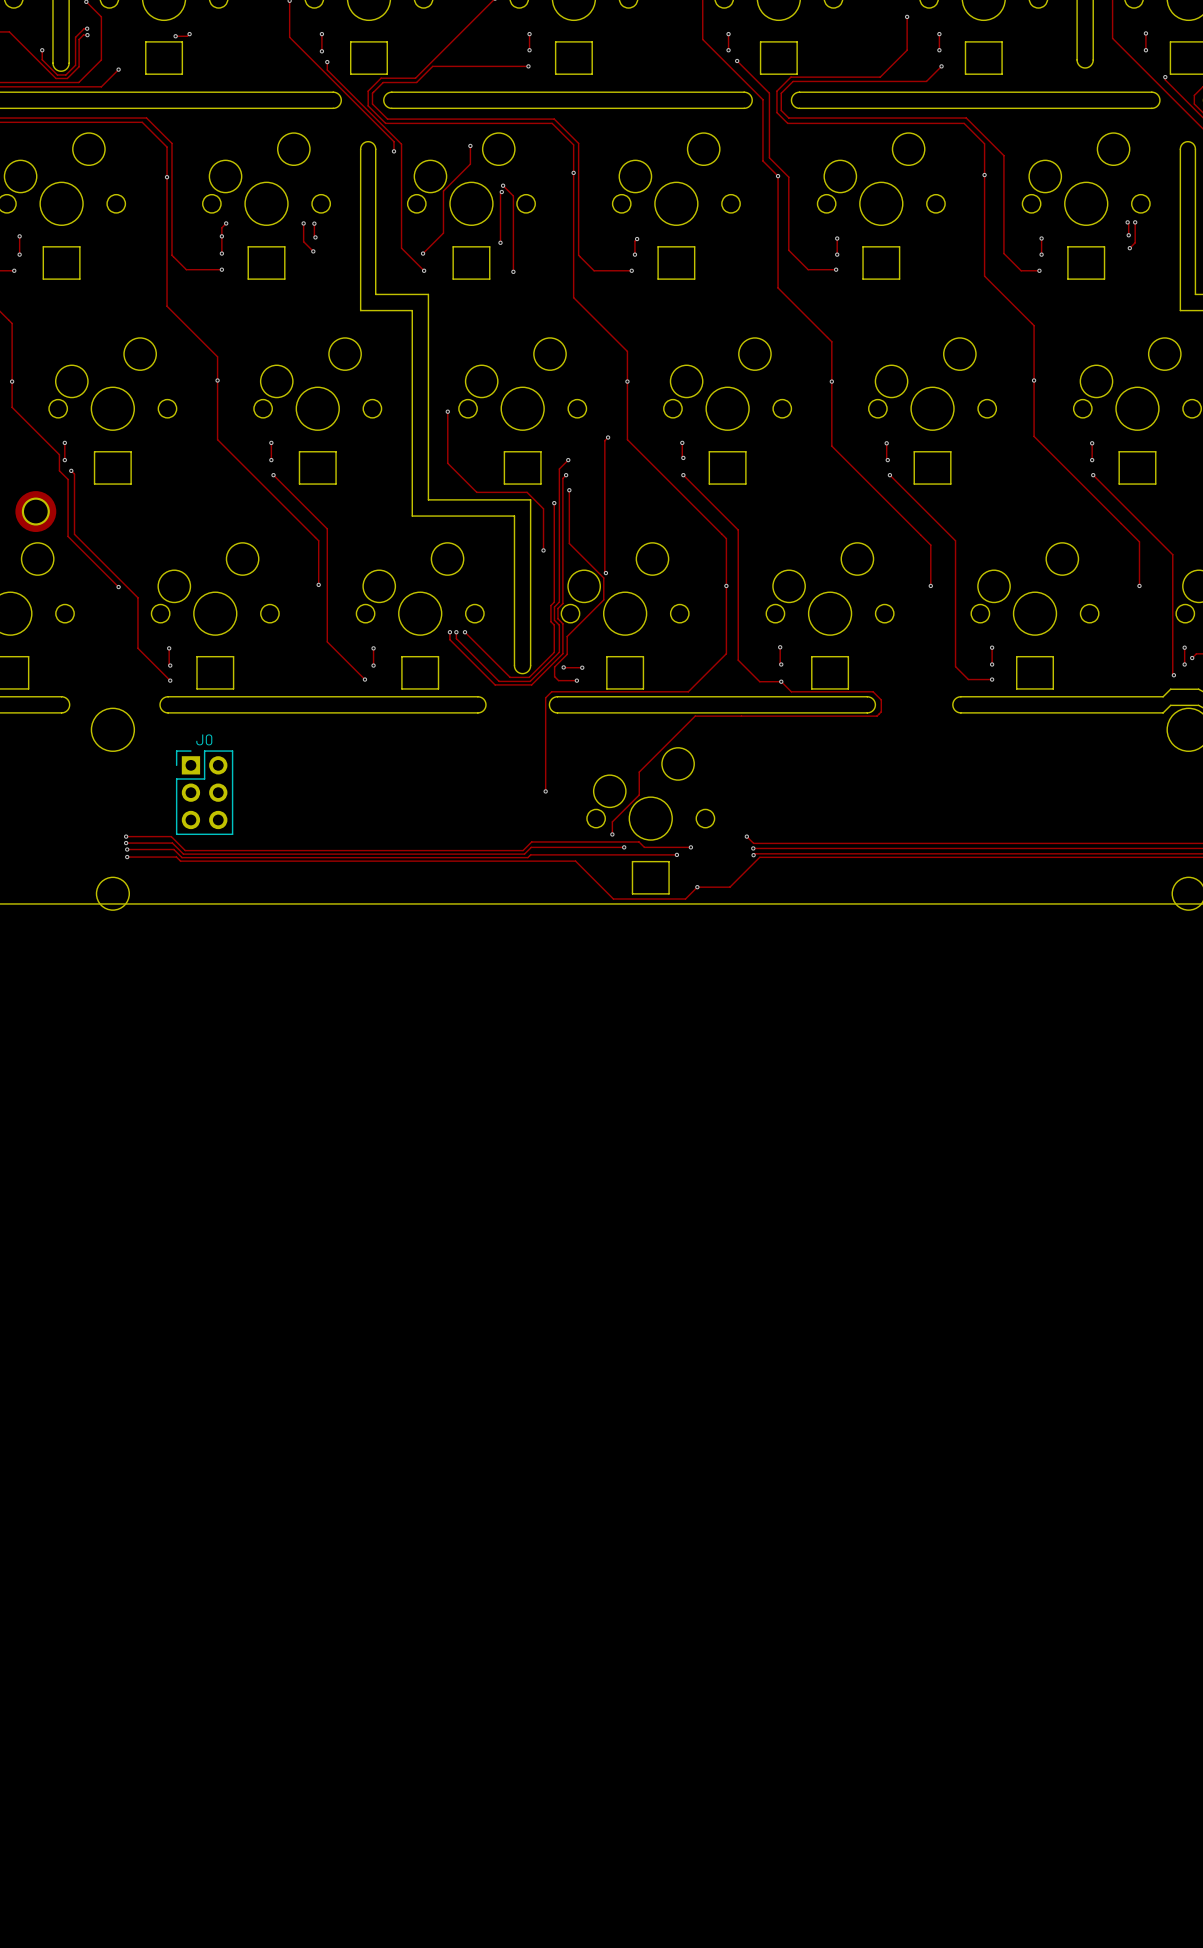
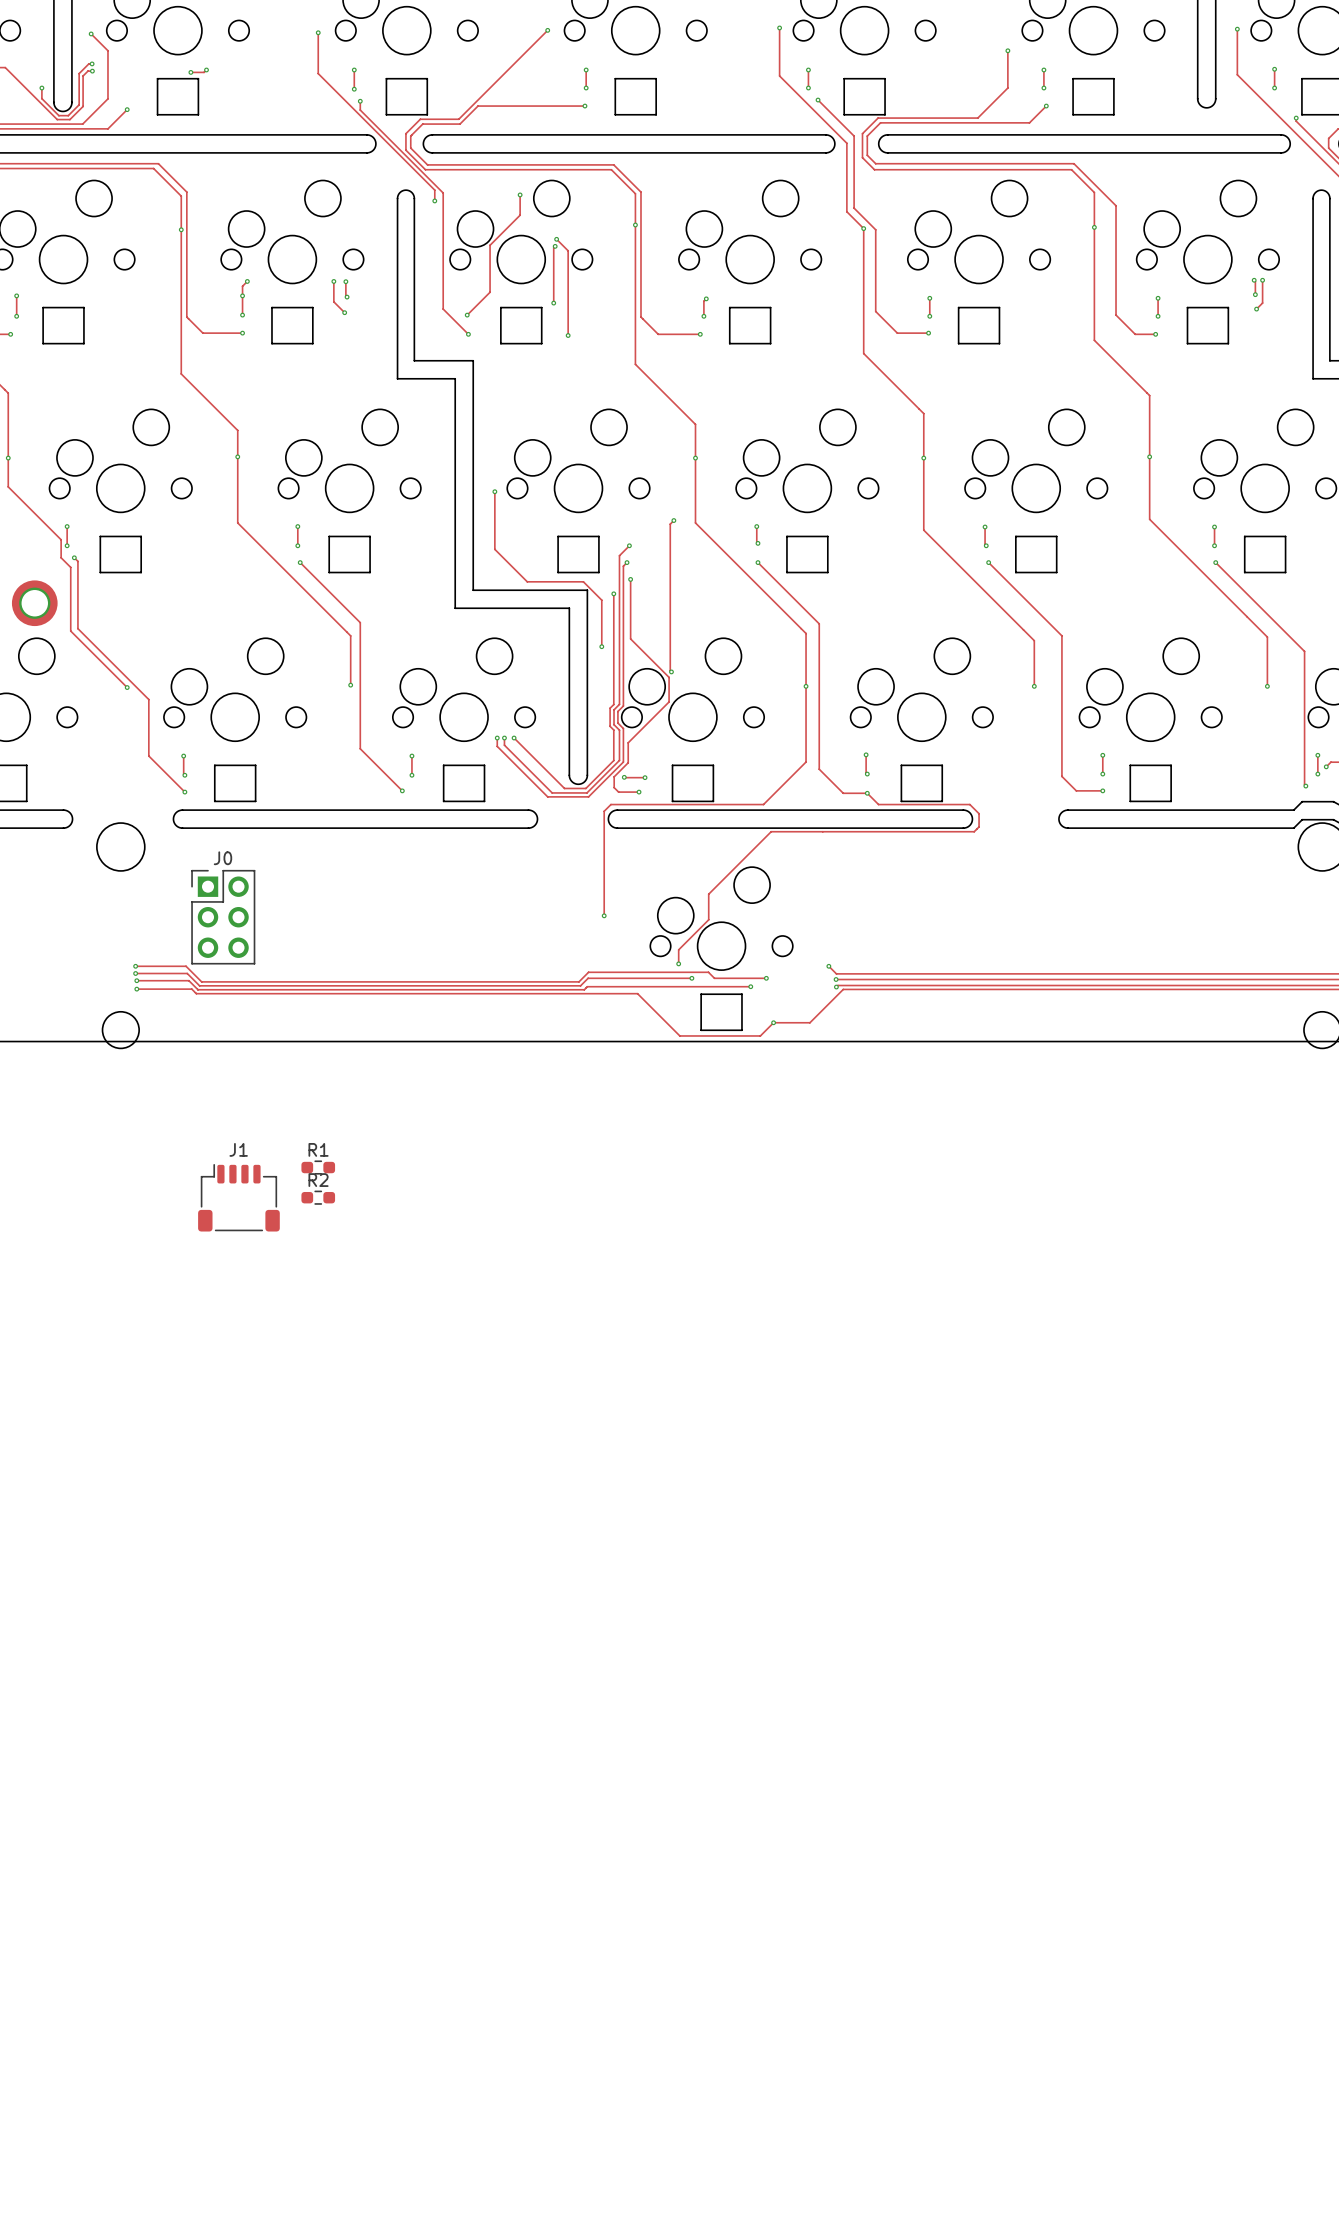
R1: none -> (318, 1167)
J1: none -> (238, 1197)
R2: none -> (318, 1197)

